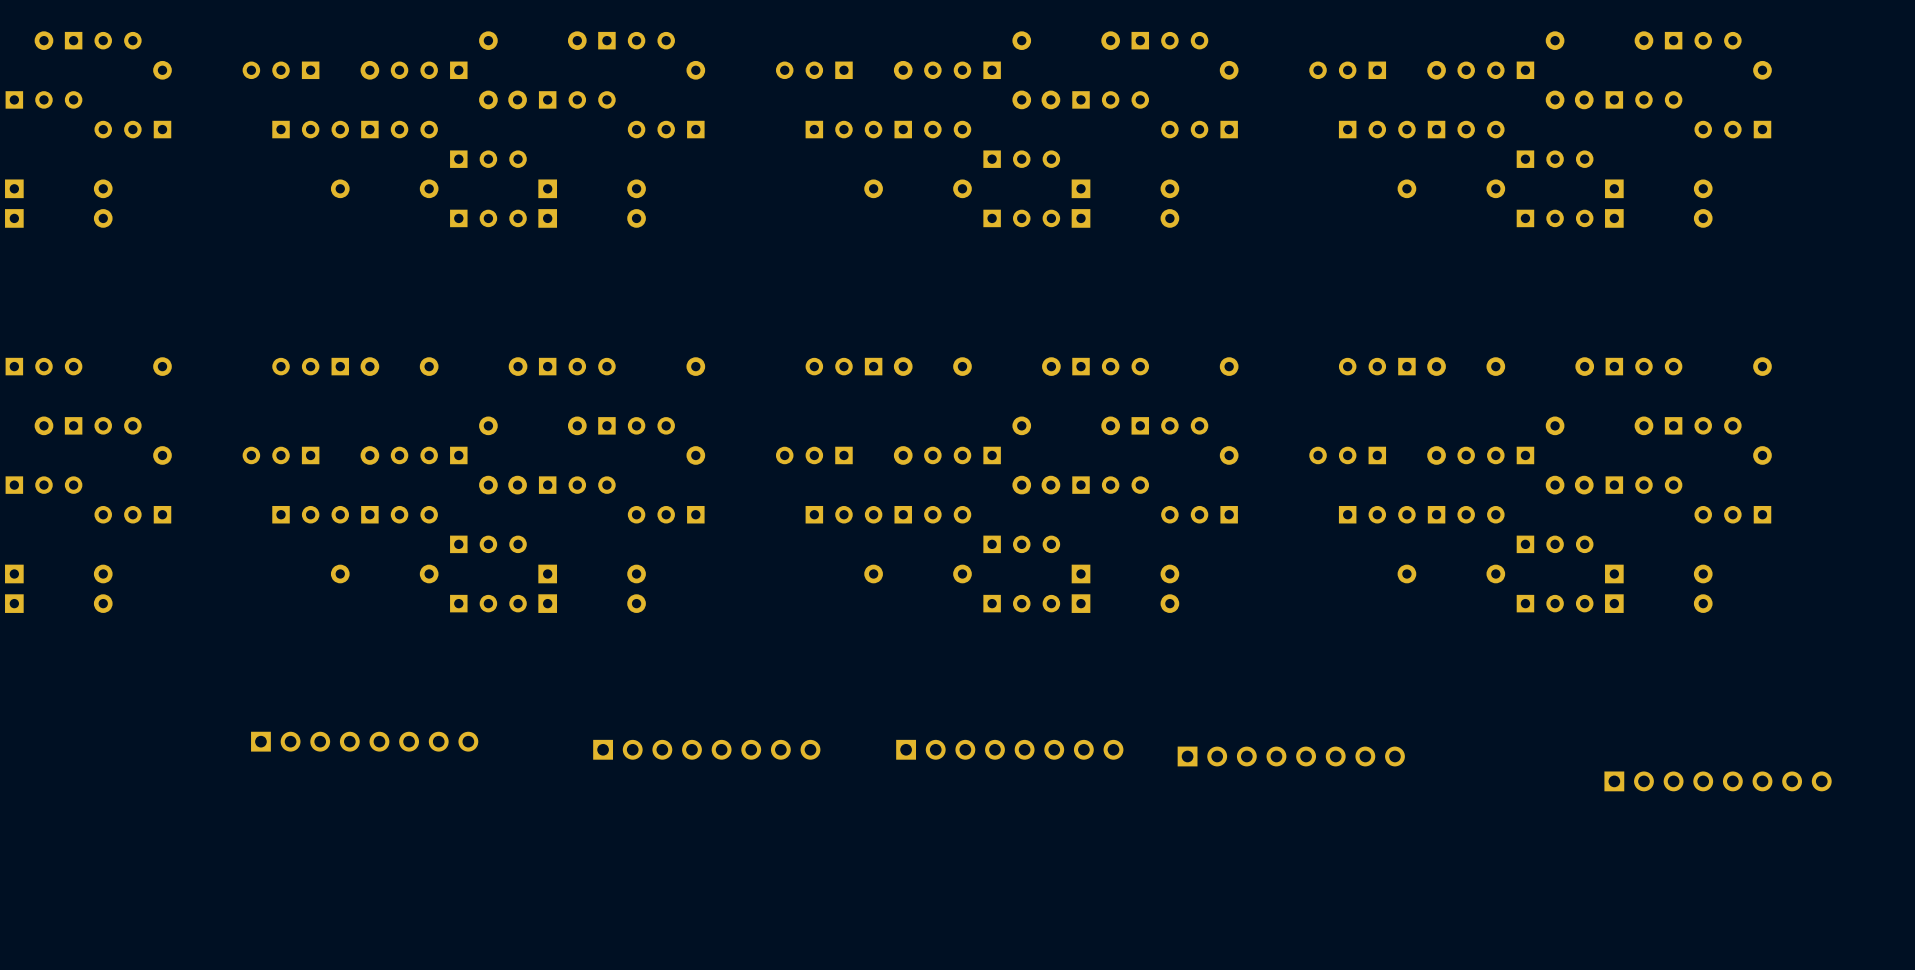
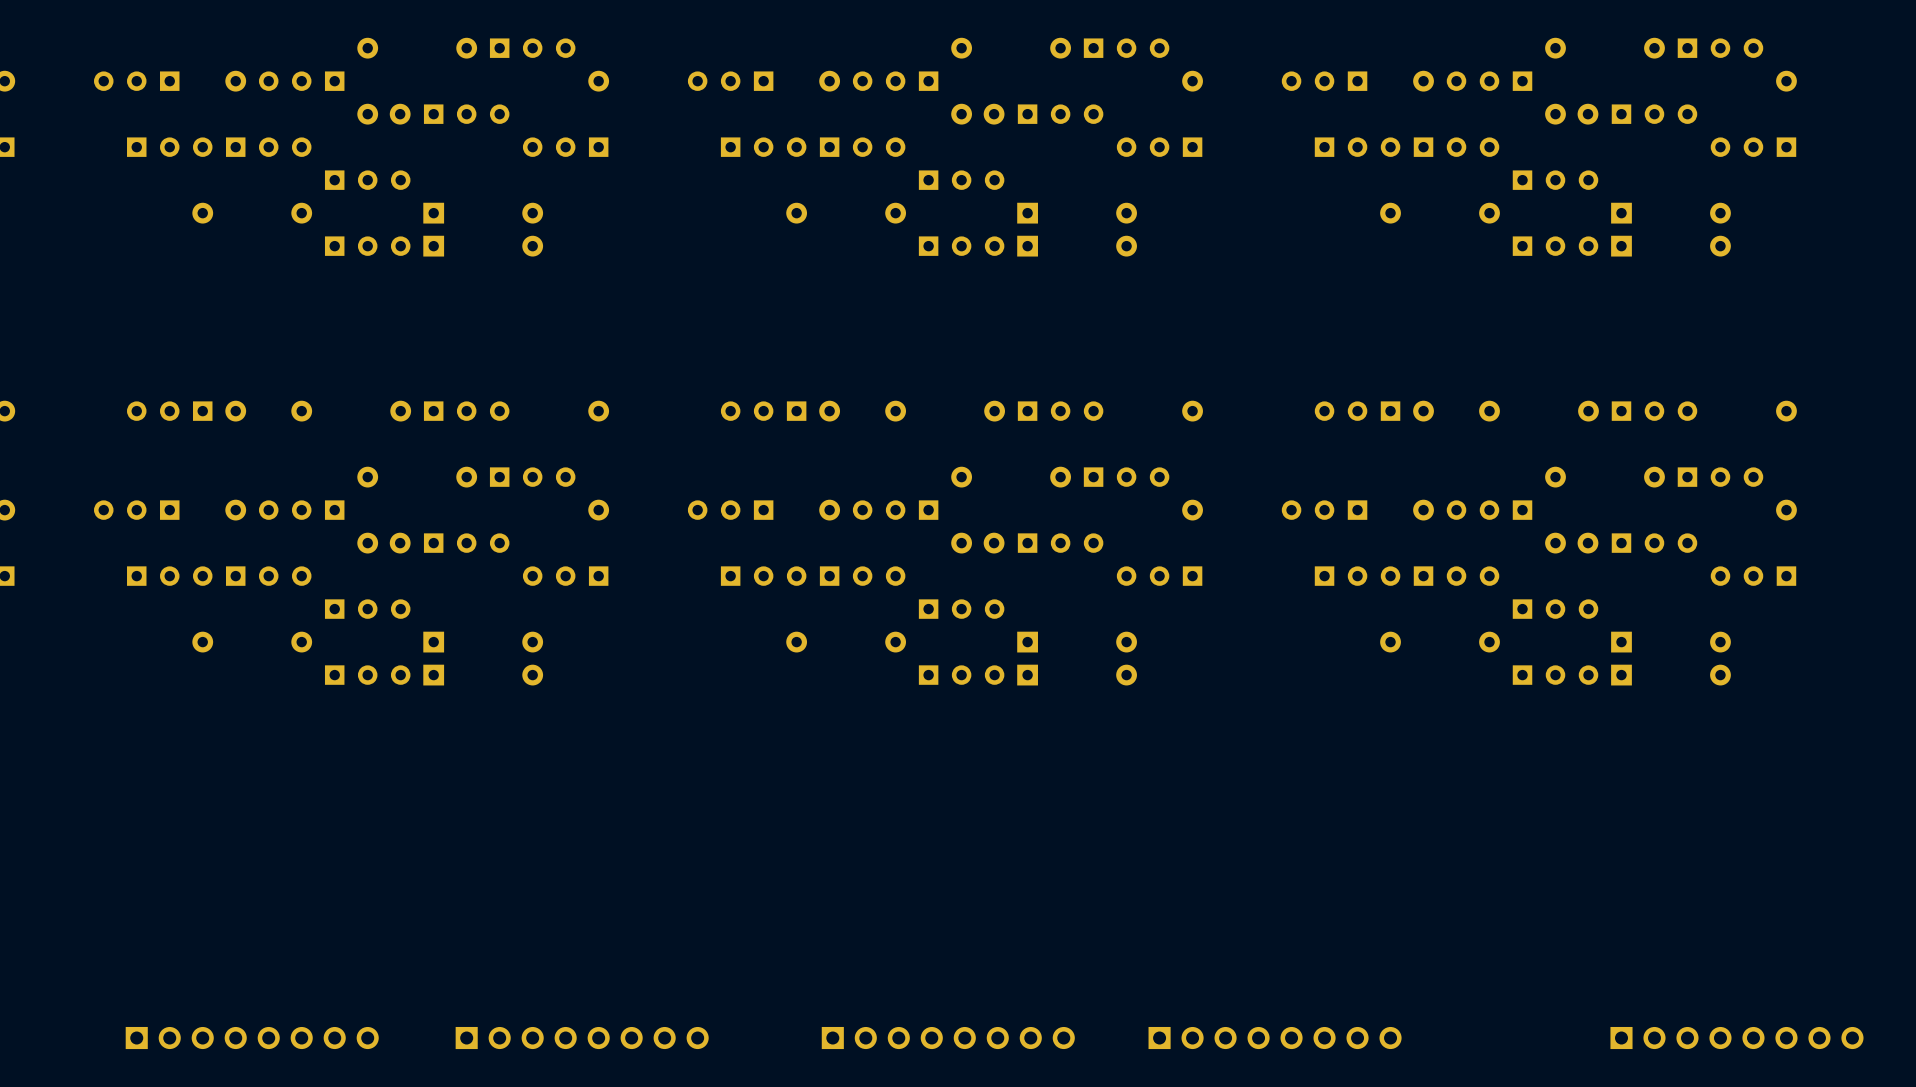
part: (364, 741) -> none
part: (706, 749) -> none
part: (1009, 749) -> none
part: (1291, 756) -> none
part position: (1718, 781) -> (1736, 1038)
part: none -> (252, 1038)
part: none -> (582, 1038)
part: none -> (948, 1038)
part: none -> (1275, 1038)

